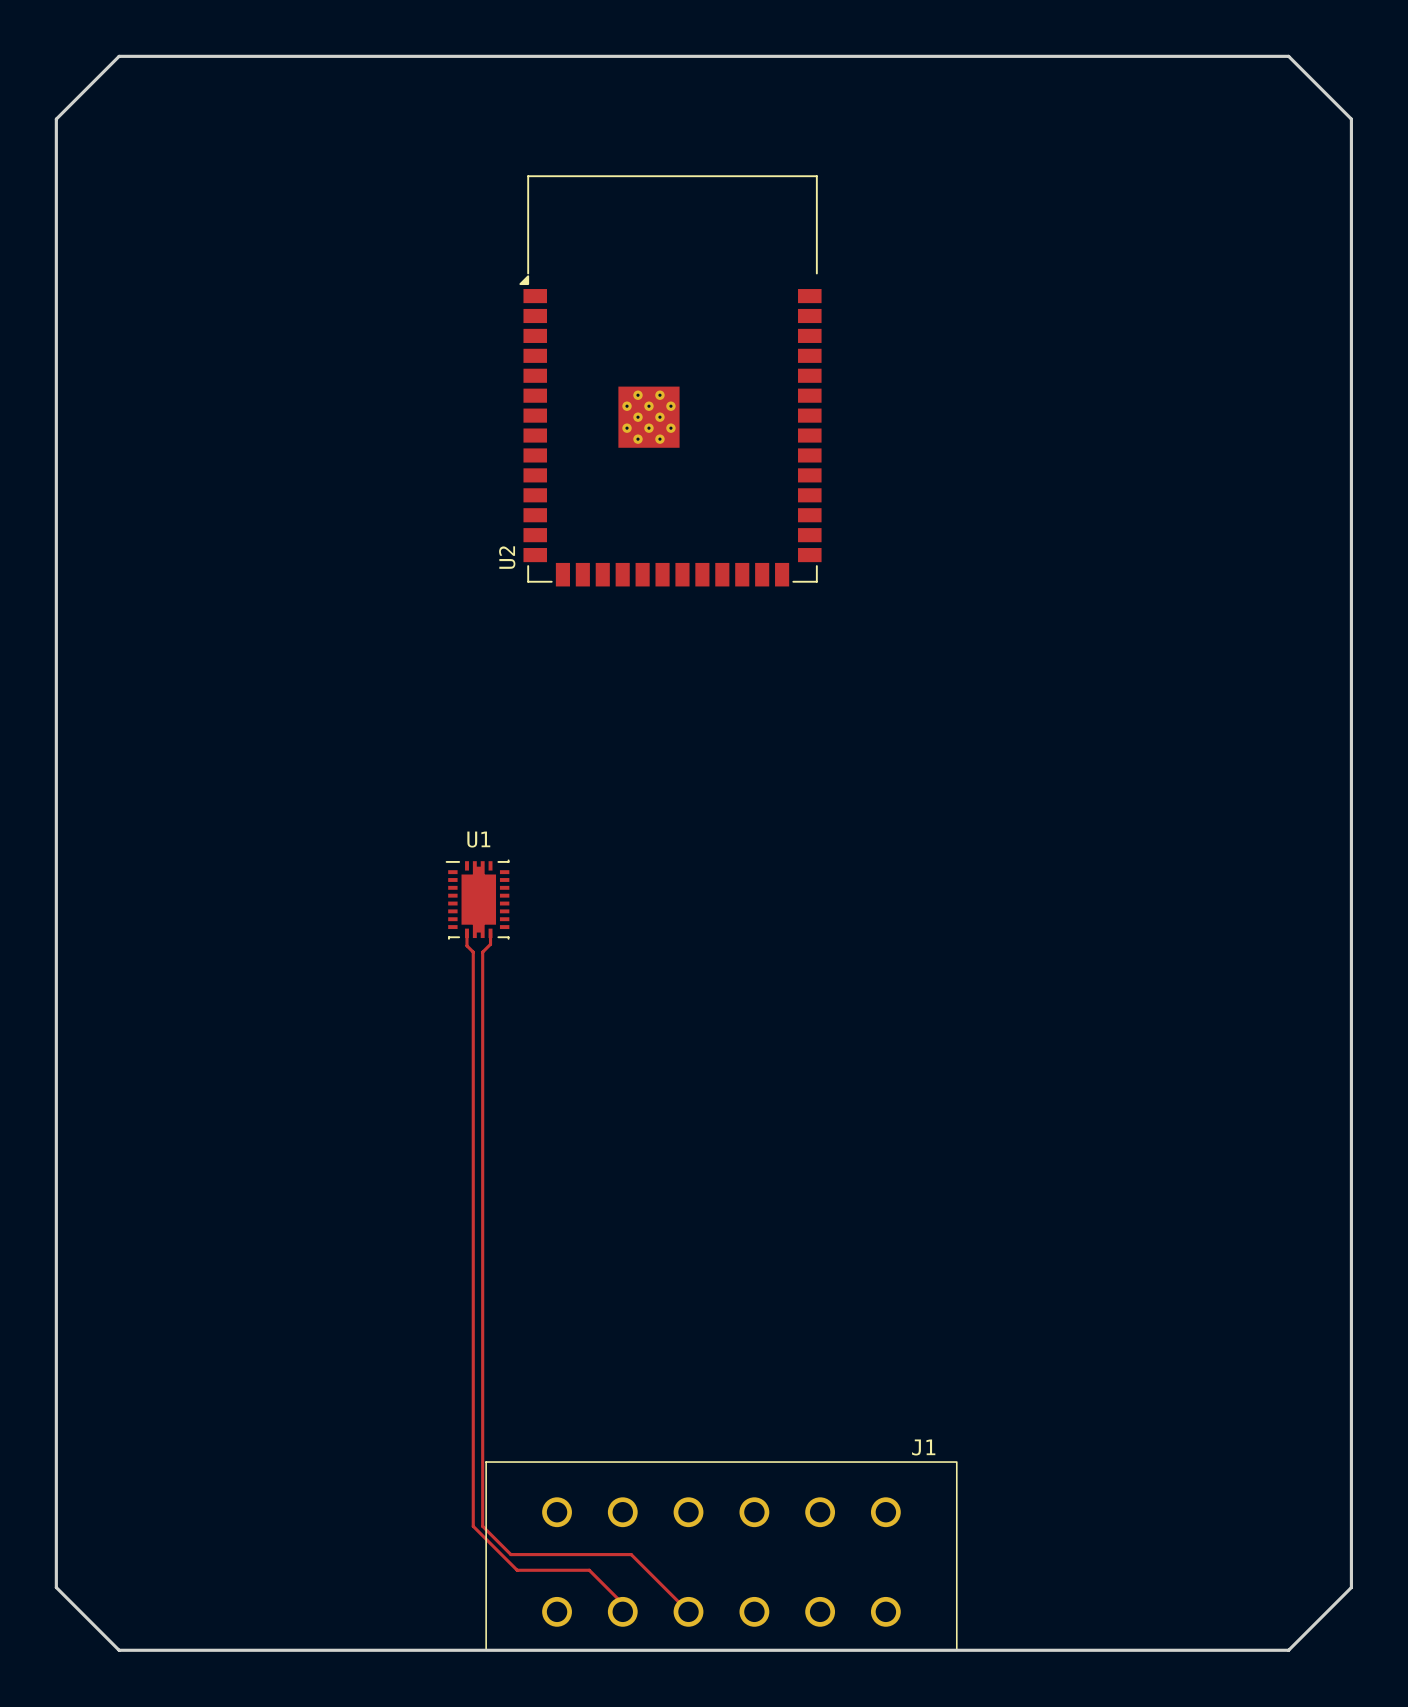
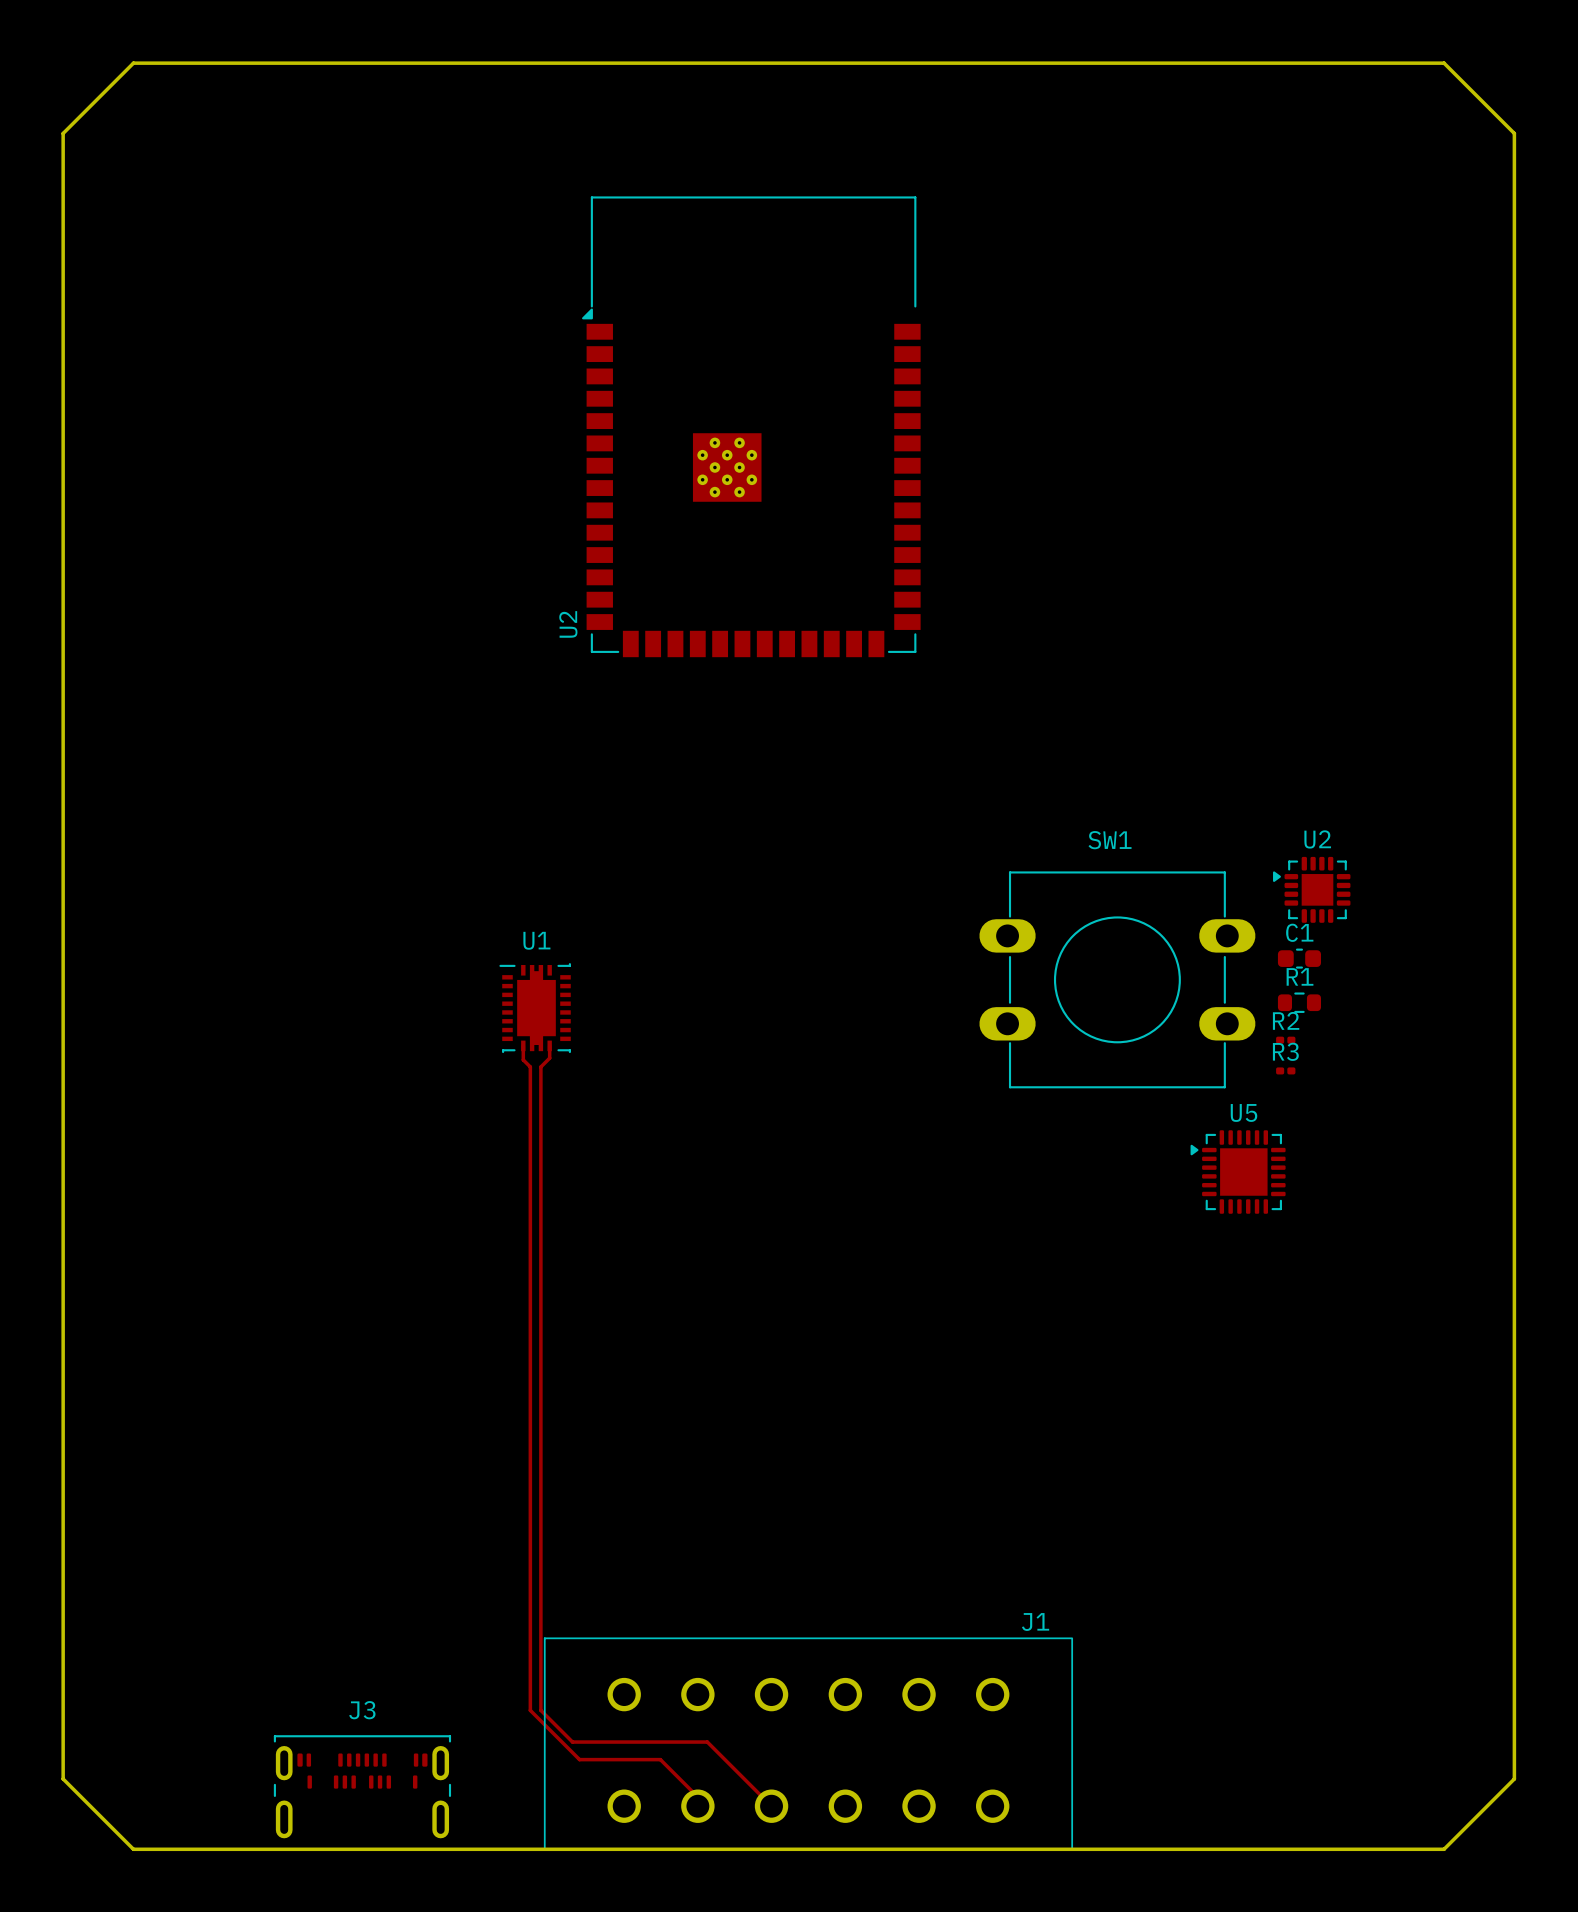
U2: none -> (1311, 889)
C1: none -> (1299, 958)
SW1: none -> (1117, 979)
R1: none -> (1299, 1002)
R2: none -> (1285, 1040)
R3: none -> (1285, 1070)
U5: none -> (1238, 1172)
J3: none -> (362, 1786)

